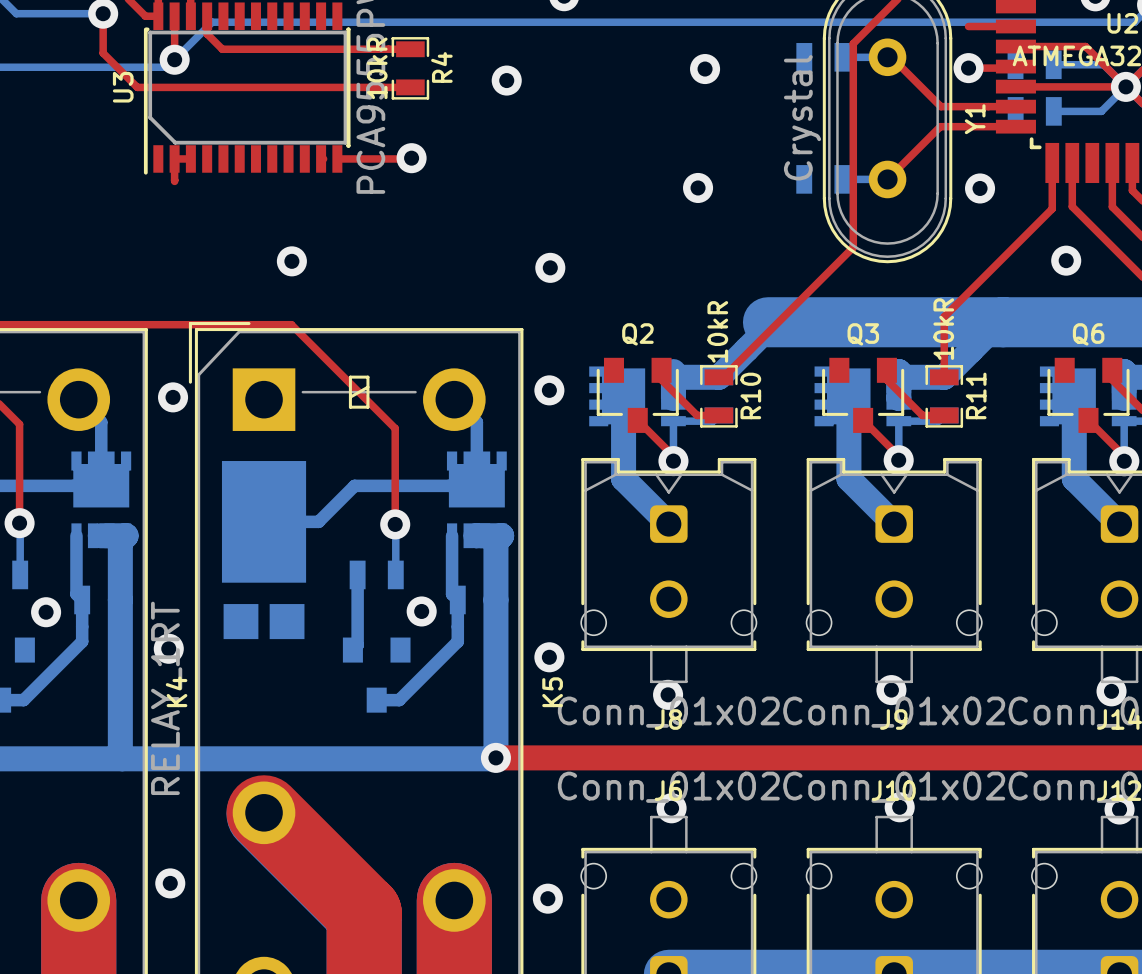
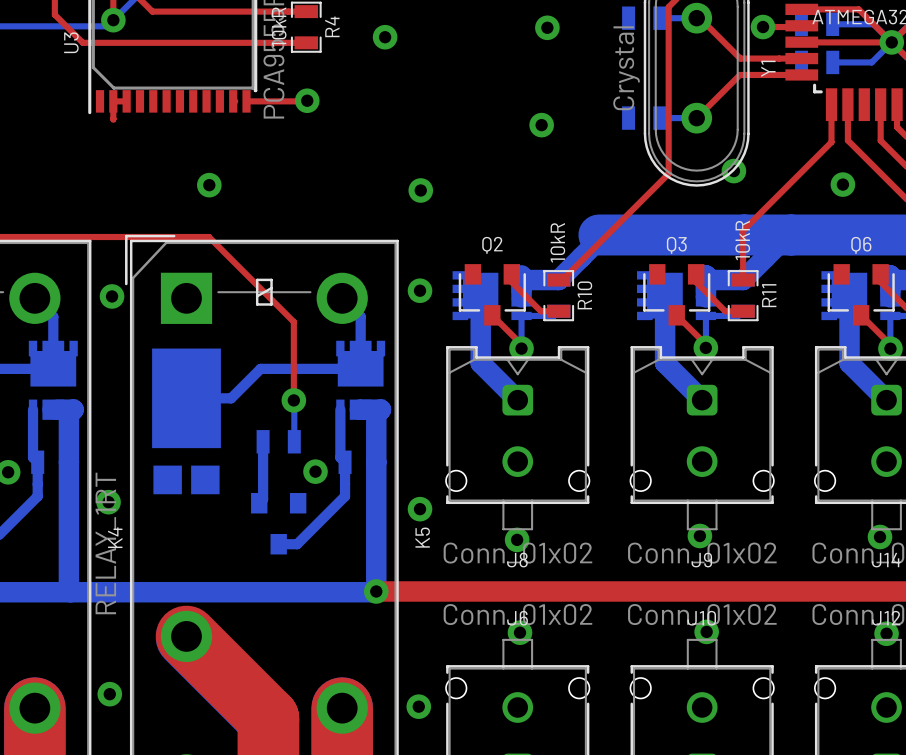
via position: (980, 188) -> (733, 171)

